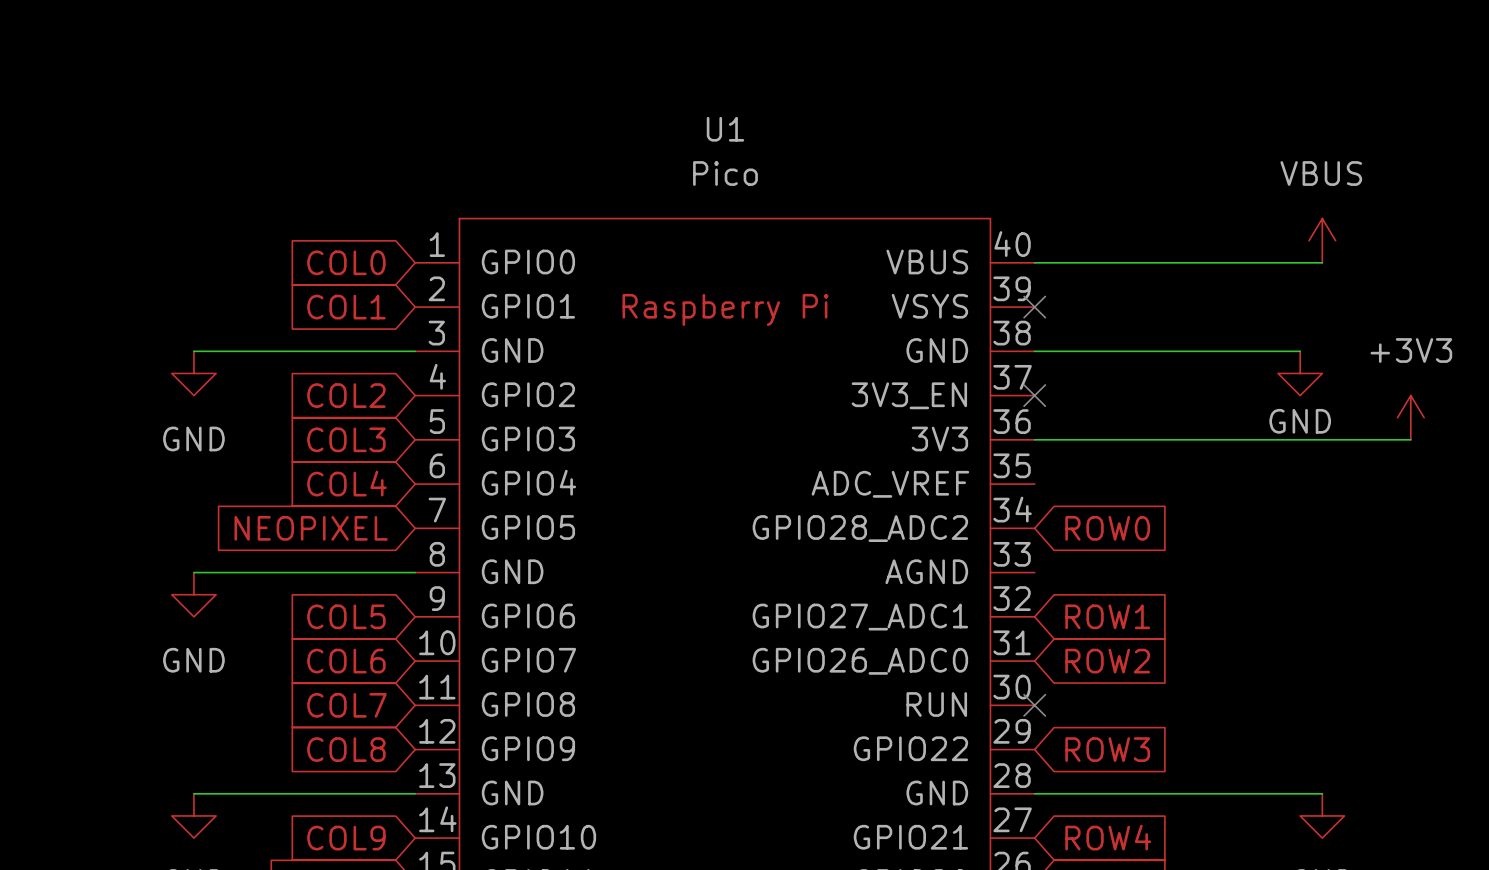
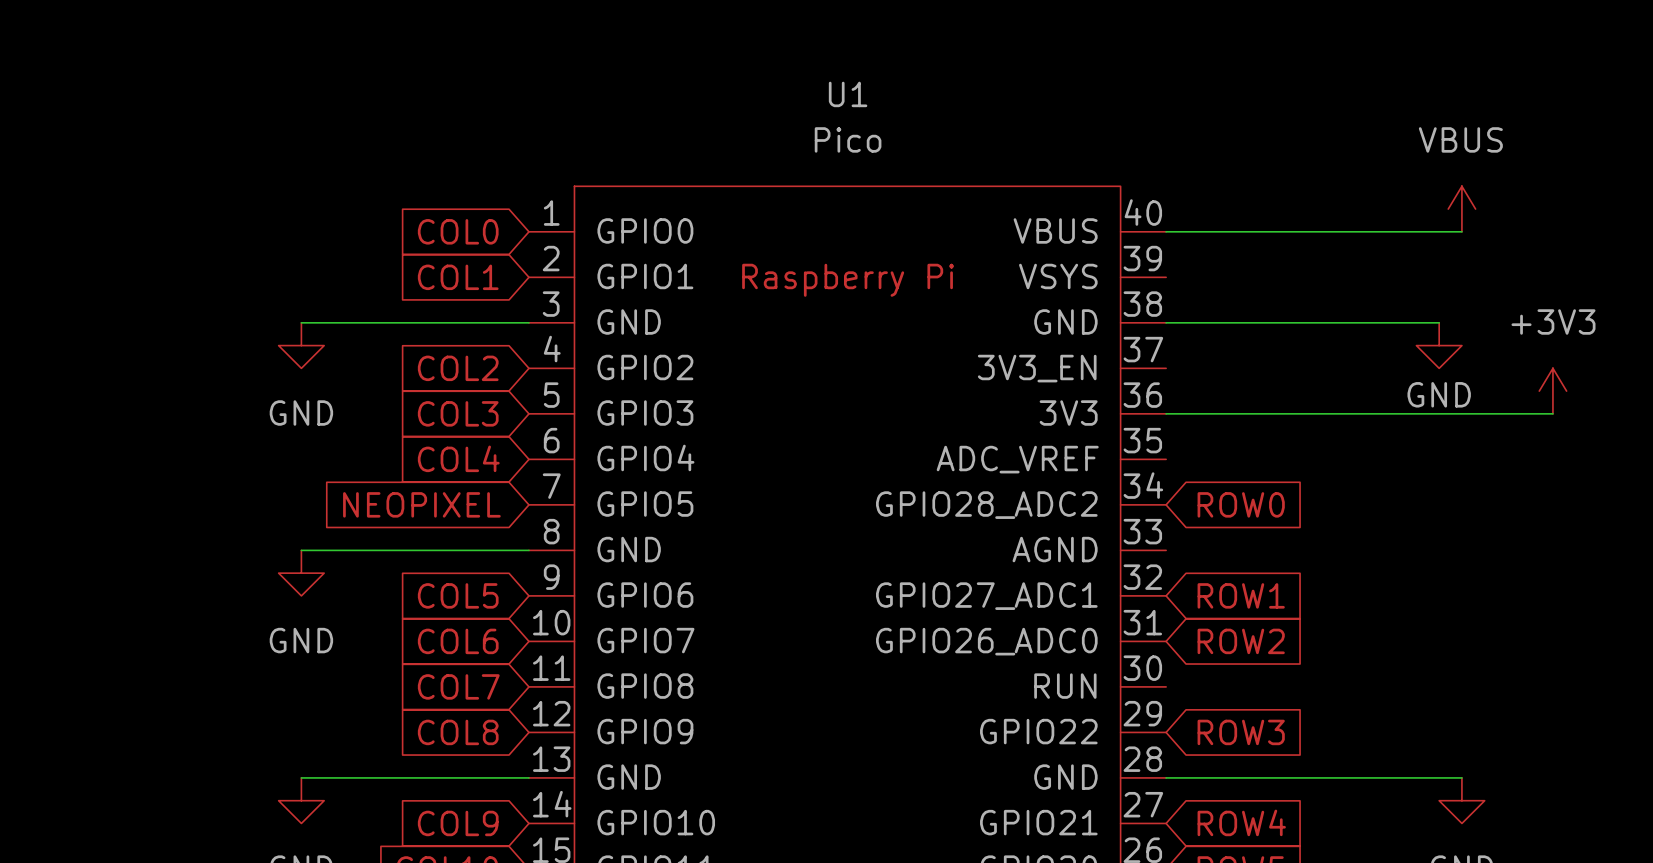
no-connect mark: (1034, 307) -> none
no-connect mark: (1034, 395) -> none
no-connect mark: (1034, 705) -> none

